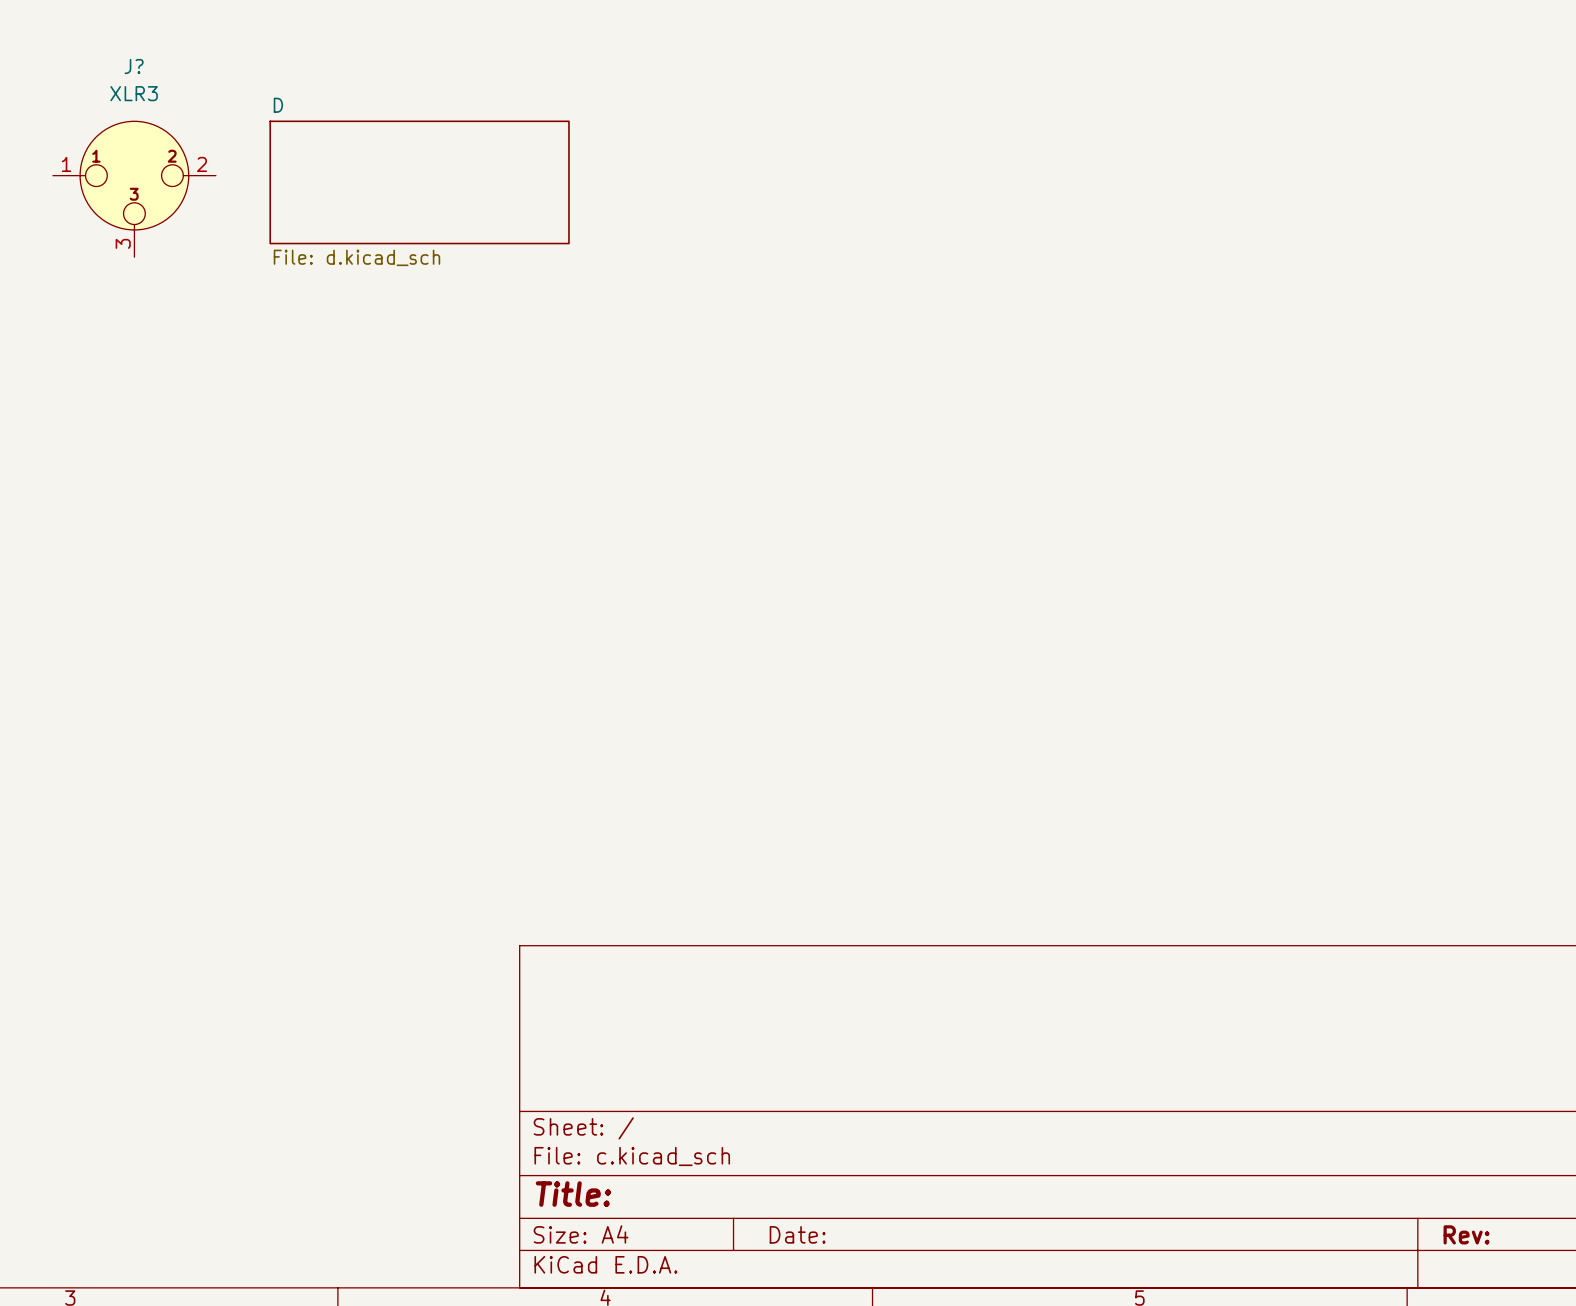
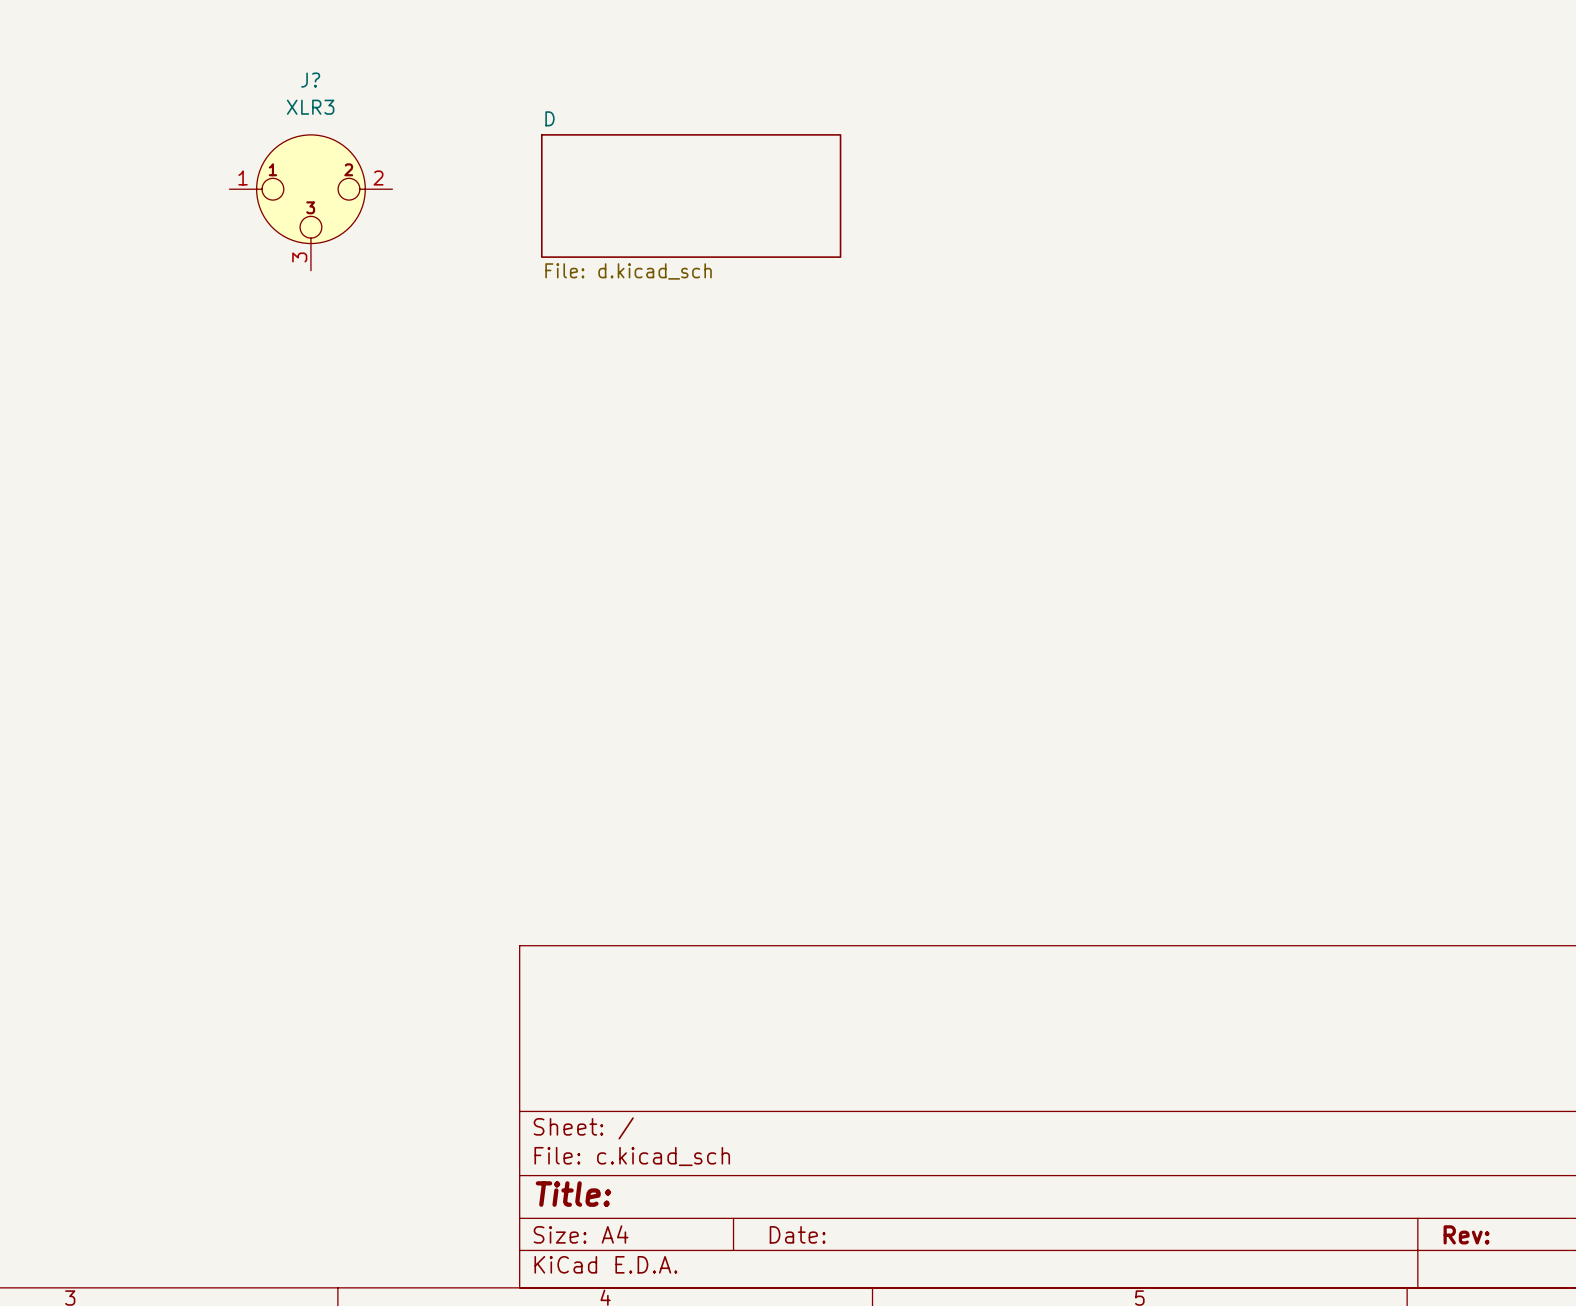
sheet D: File: d.kicad_sch (419, 182) -> none
J? position: (134, 189) -> (310, 202)
sheet D: none -> File: d.kicad_sch (691, 196)

